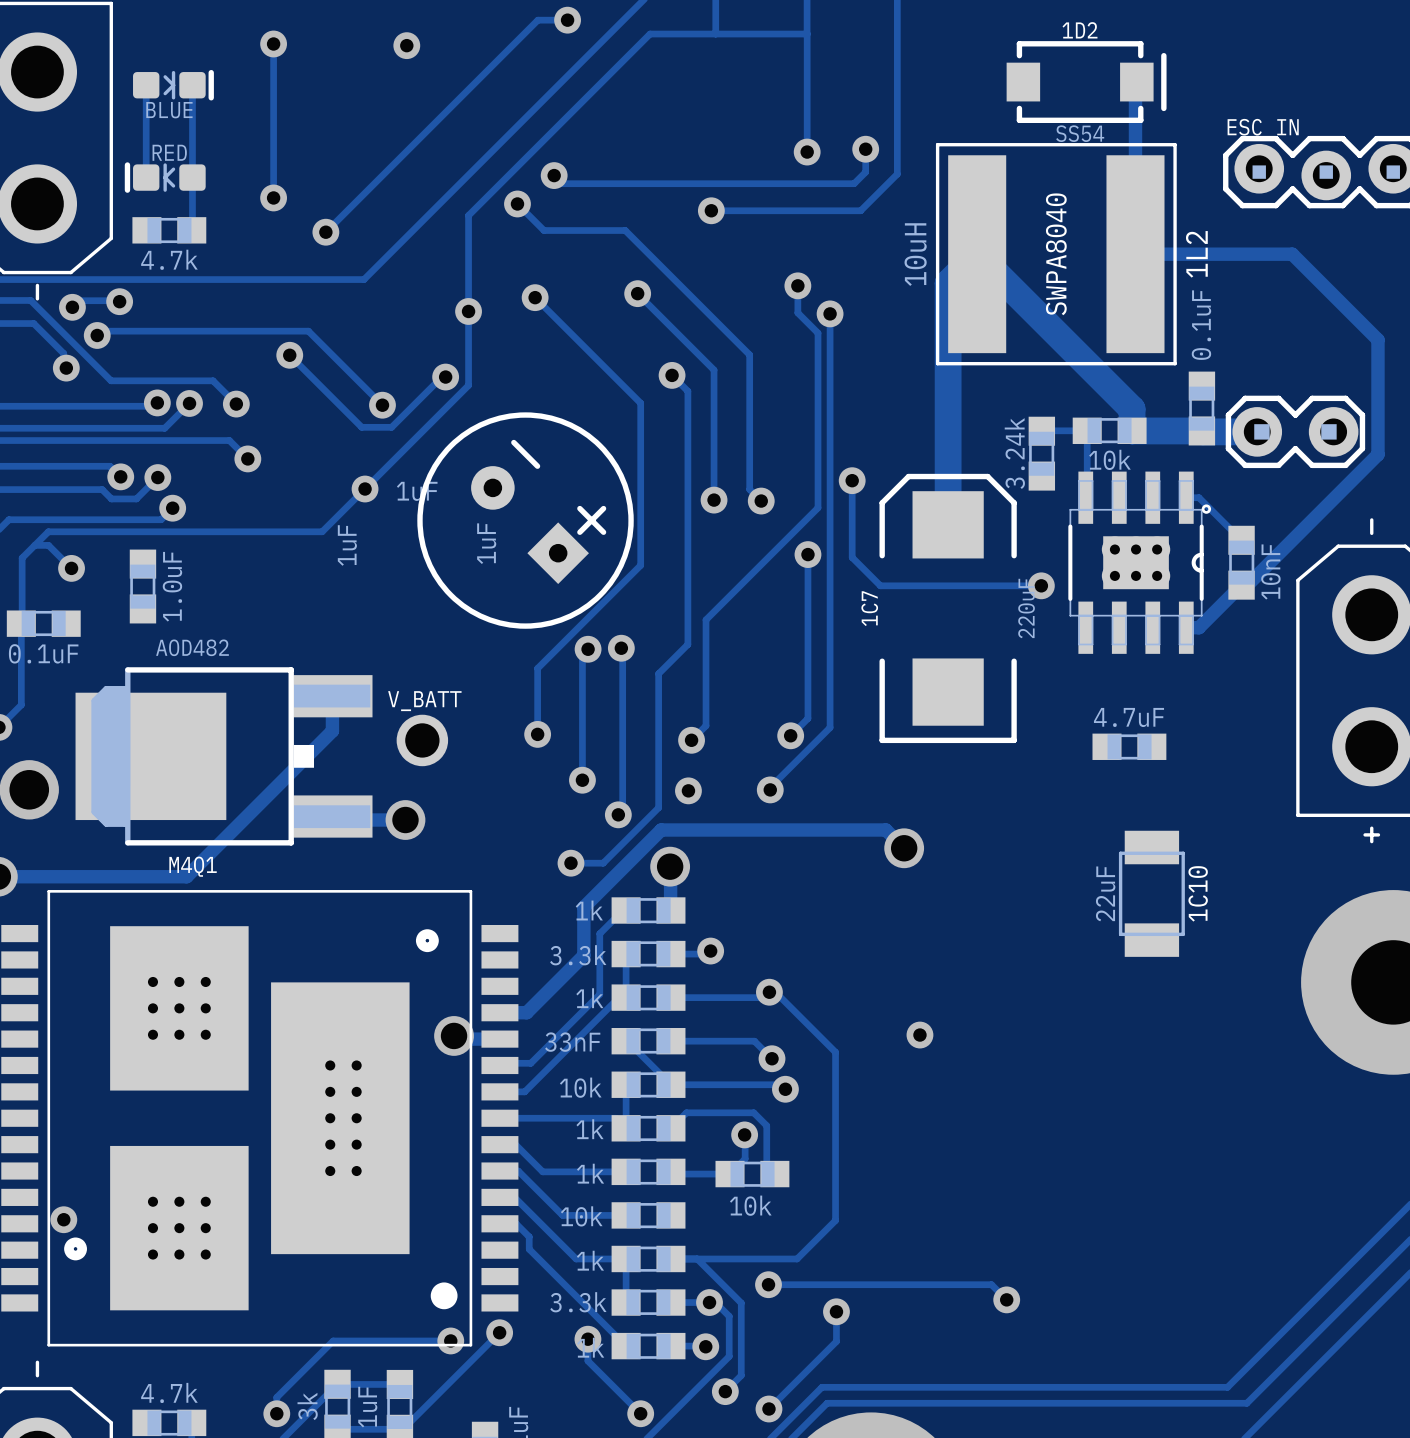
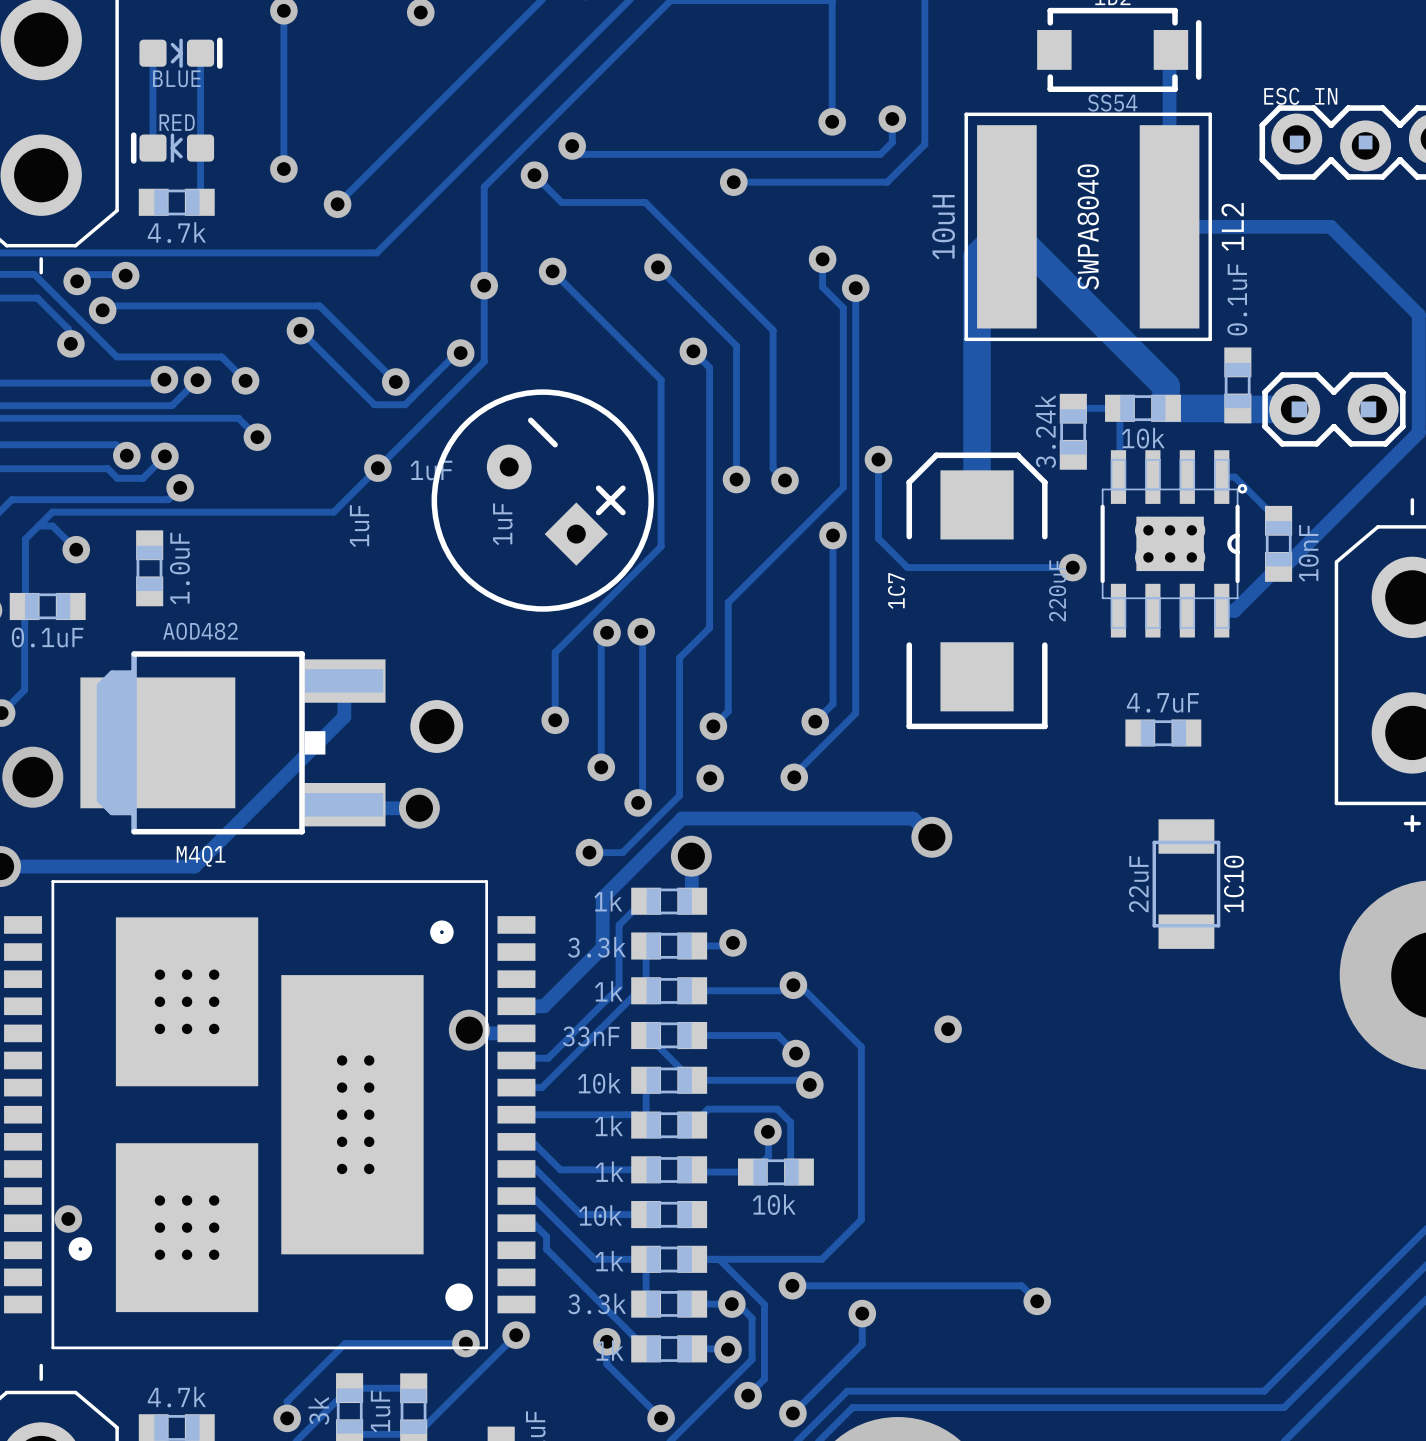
text: V_BATT (424, 701) -> none

